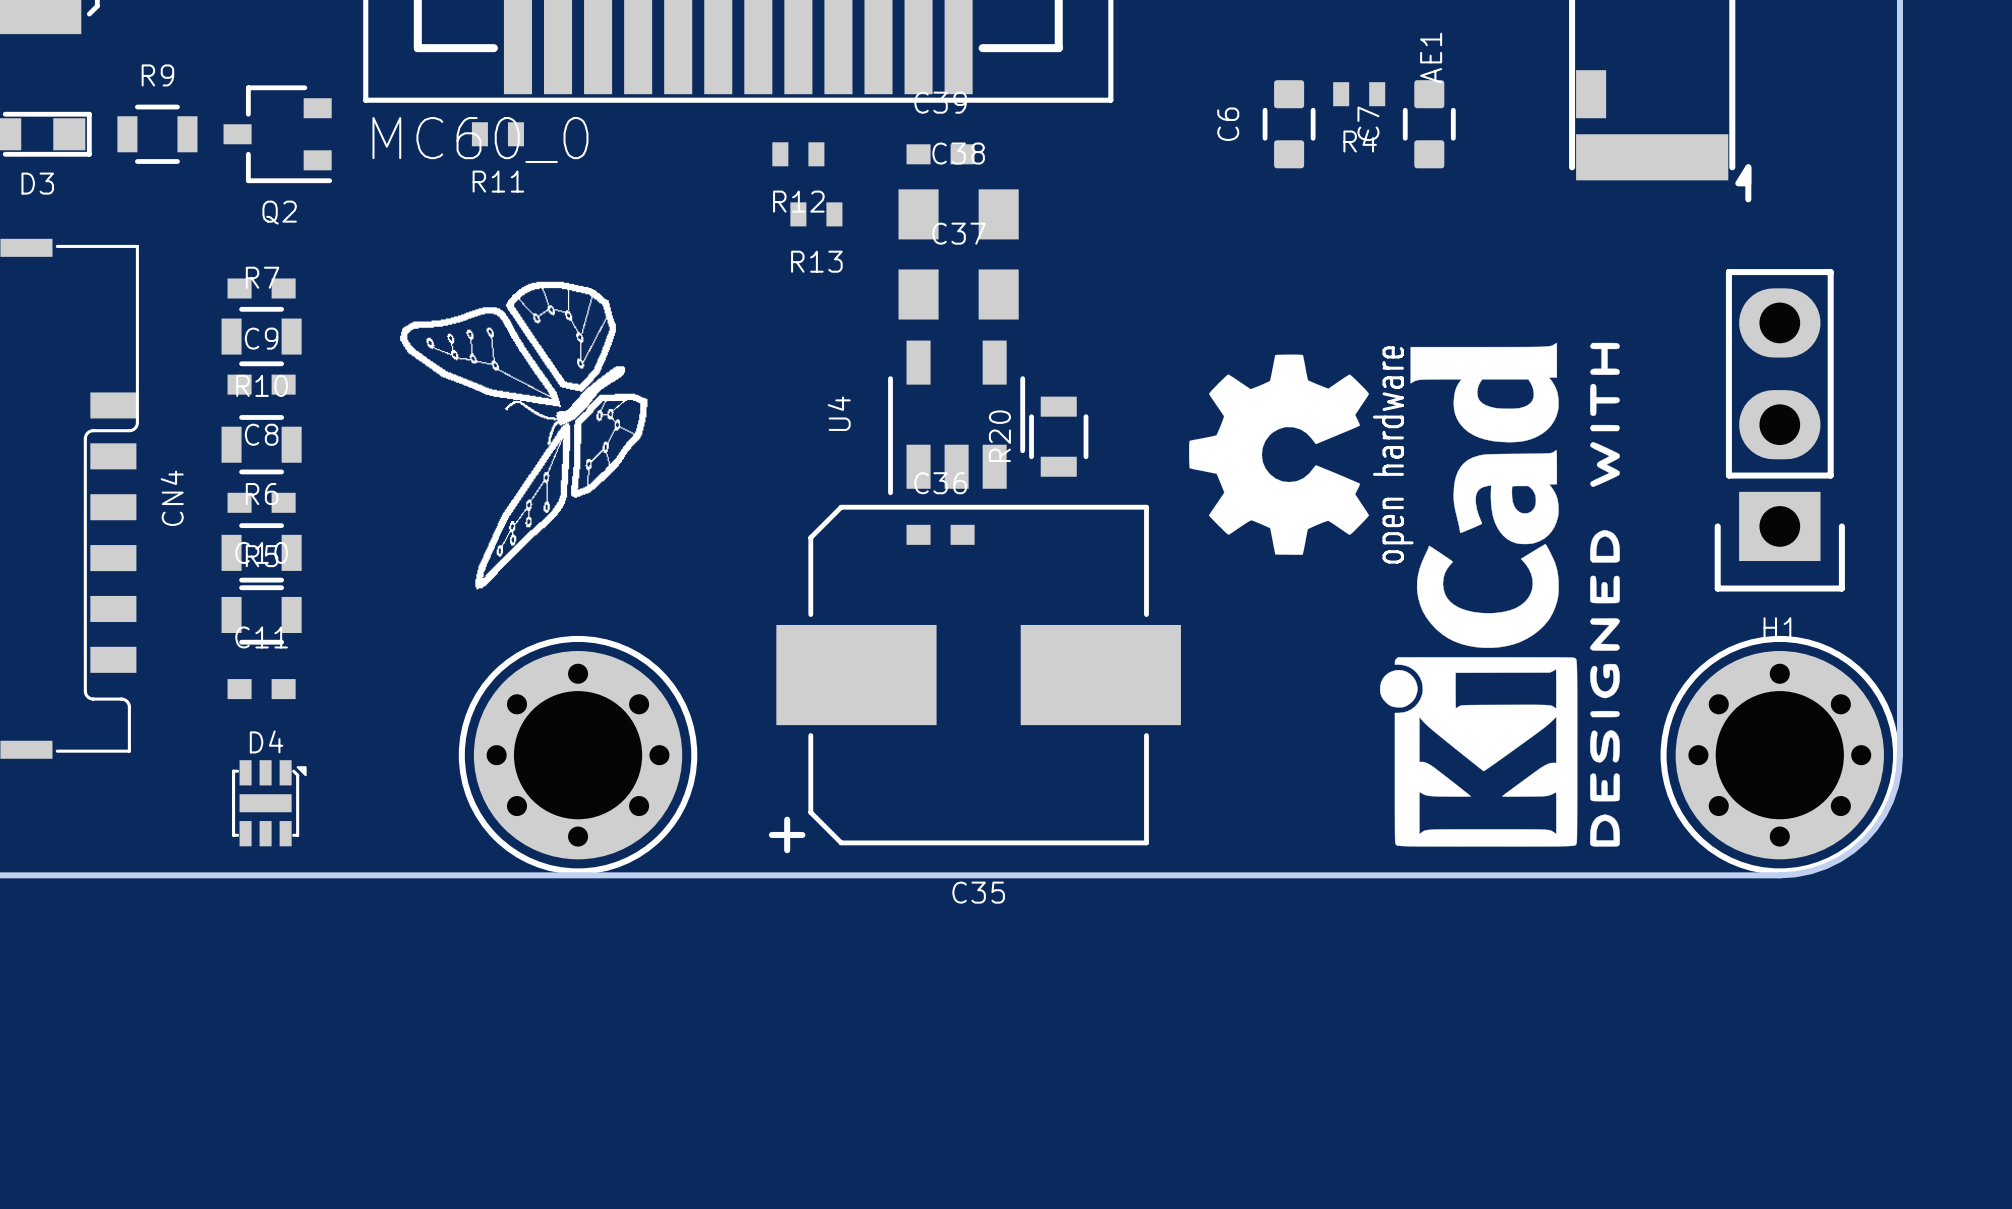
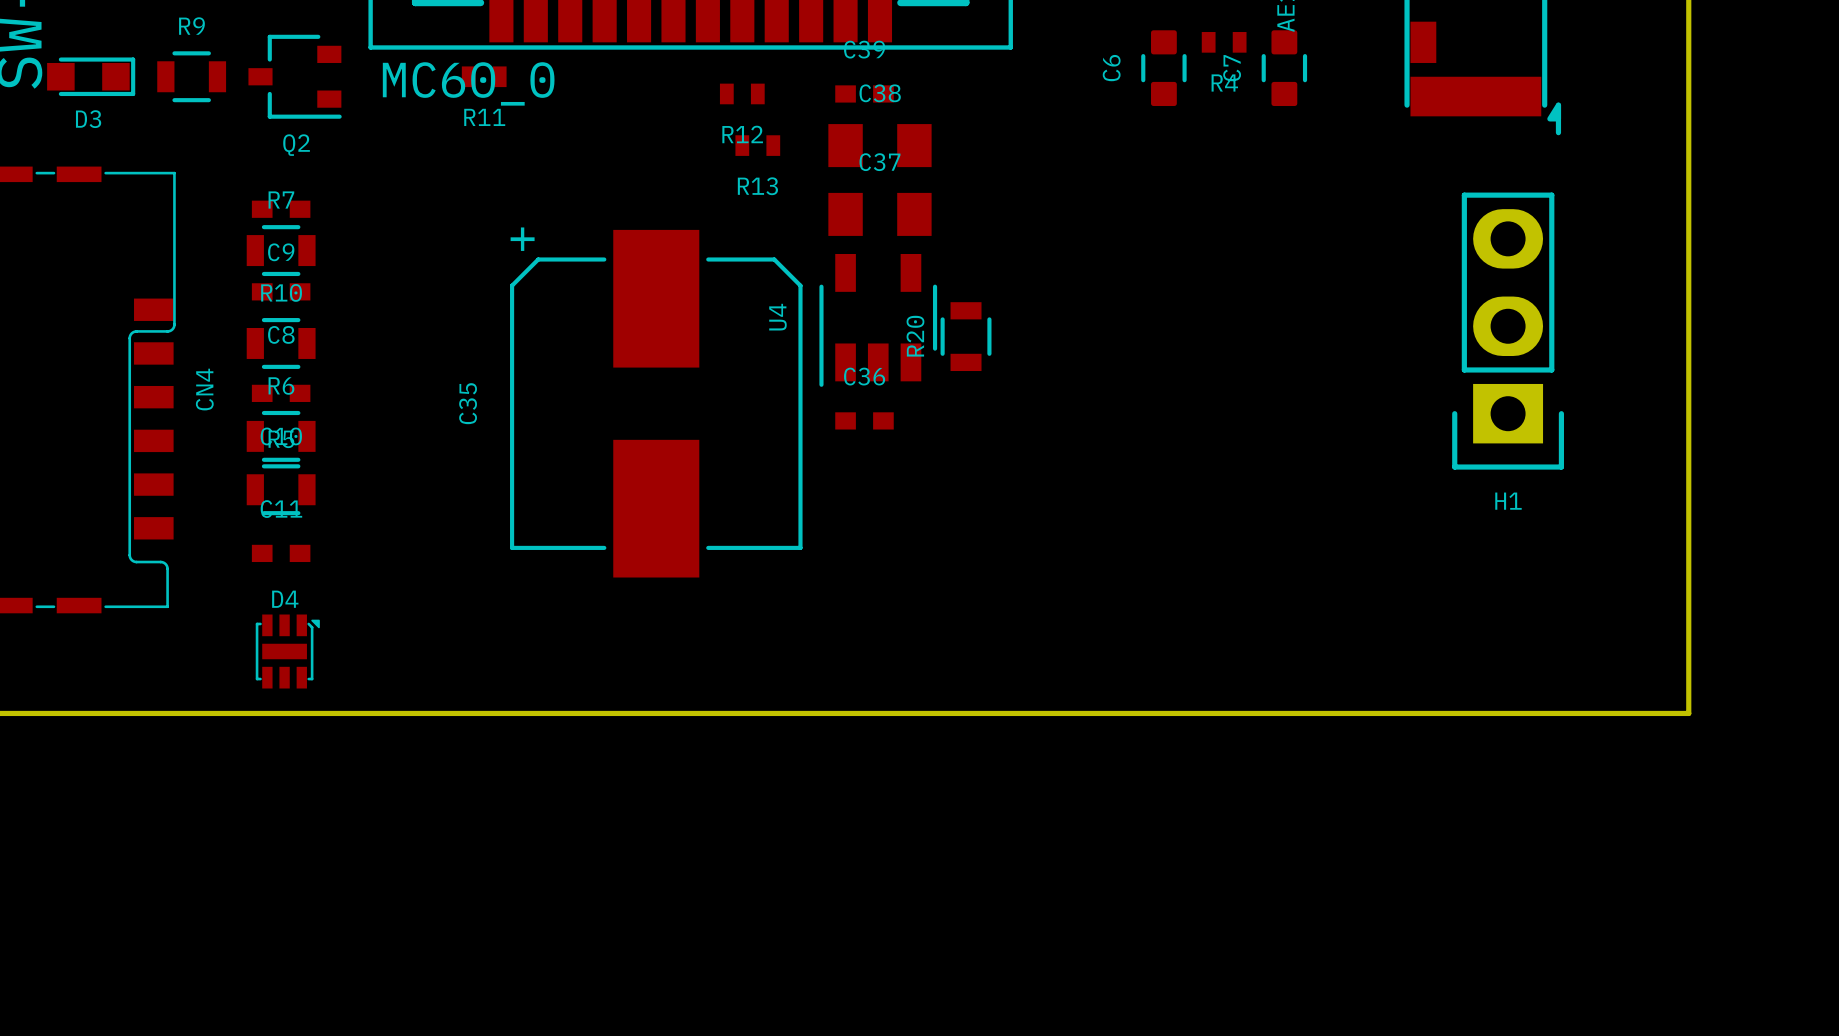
drawing: [400, 281, 648, 590] -> none
drawing: [1189, 342, 1620, 847] -> none
H1 position: (1779, 430) -> (1508, 331)
C35 rotation: 0° (978, 675) -> 90° clockwise (656, 403)
C35 position: (978, 675) -> (656, 403)
part: (578, 755) -> none
part: (1779, 755) -> none
board edge: (1899, 755) (1898, 770) (1890, 801) (1875, 828) (1864, 840) (1852, 850) (1825, 866) (1795, 874) (1779, 875) -> (1688, 610) (1688, 713) (1585, 713)

